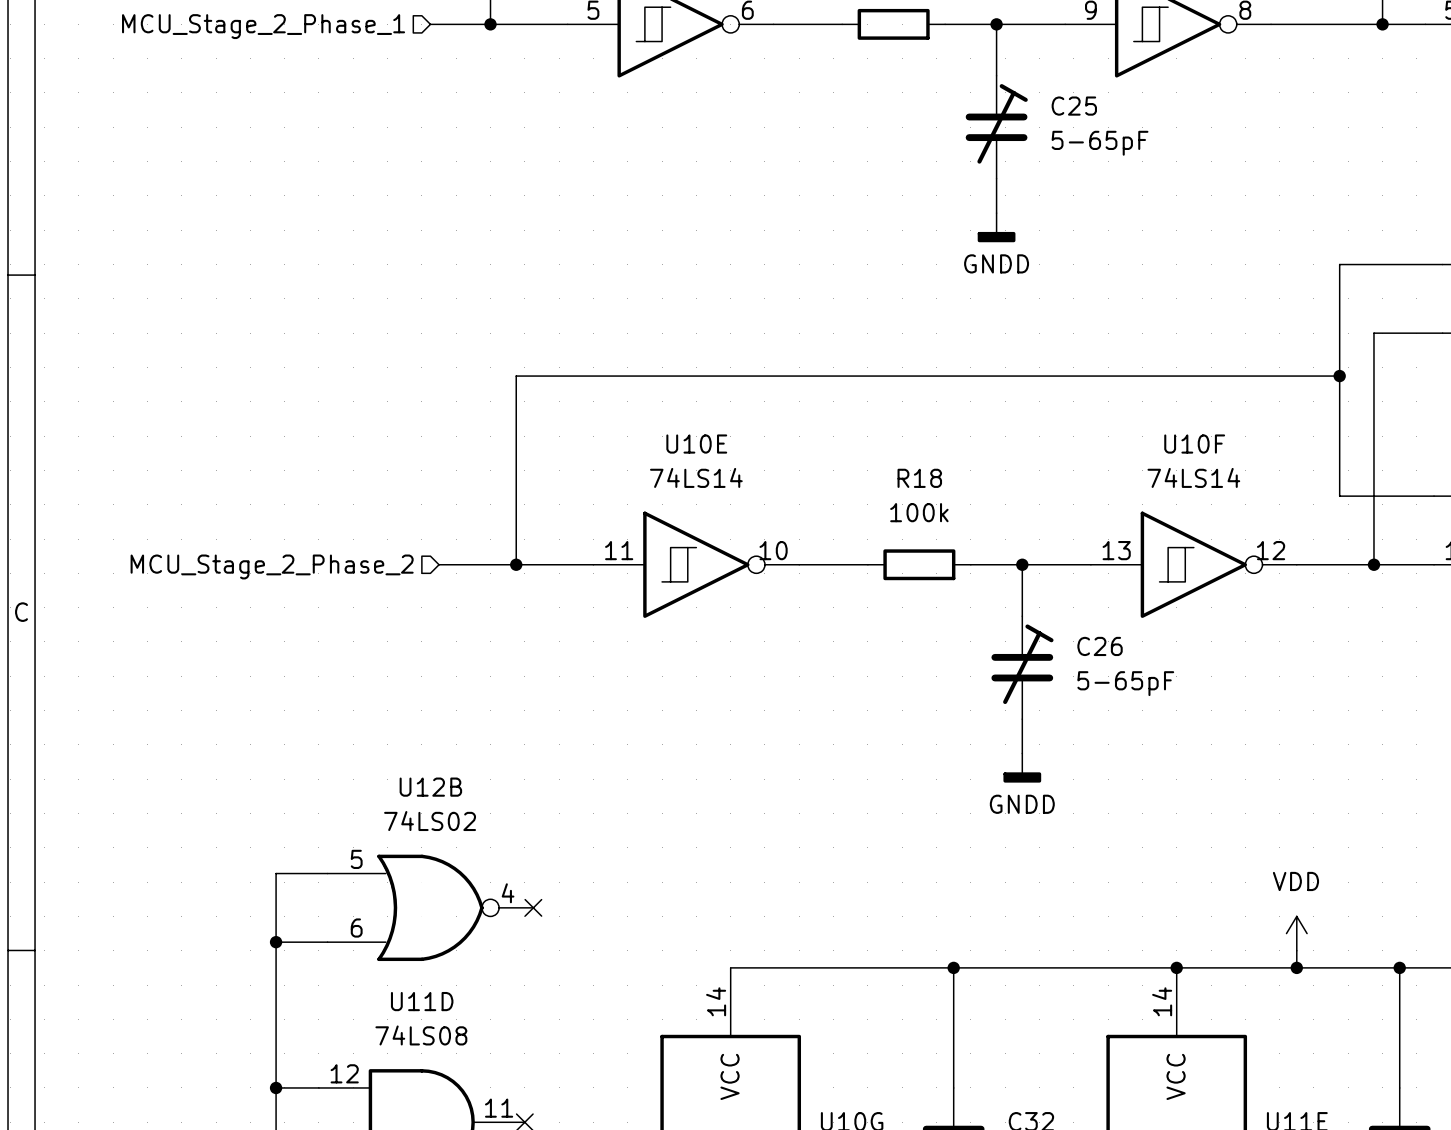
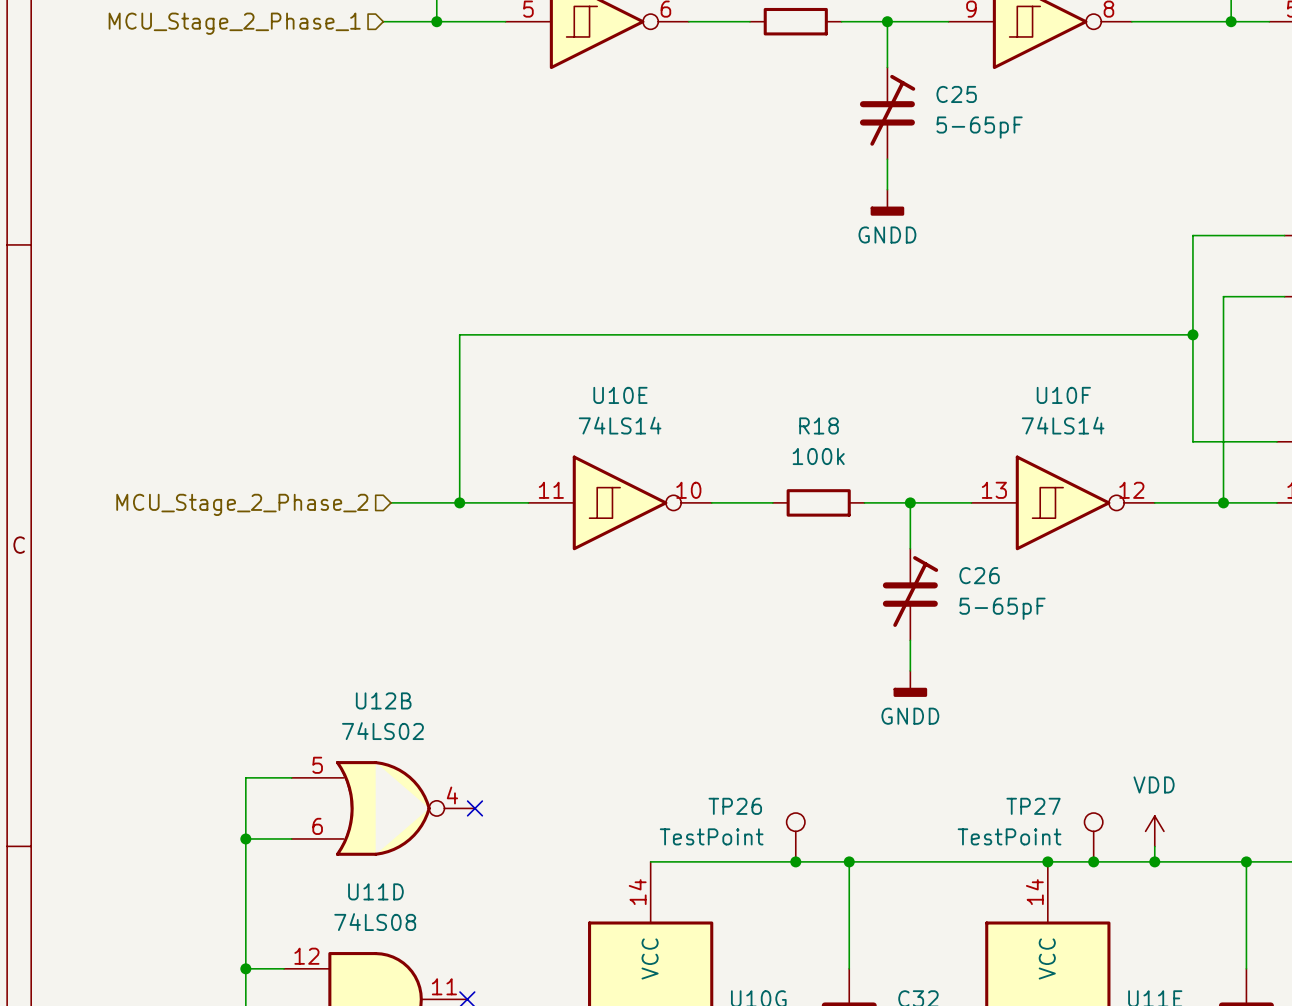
TP26: none -> TestPoint (795, 837)
TP27: none -> TestPoint (1093, 837)
junction: none -> (795, 861)
junction: none -> (1093, 861)

